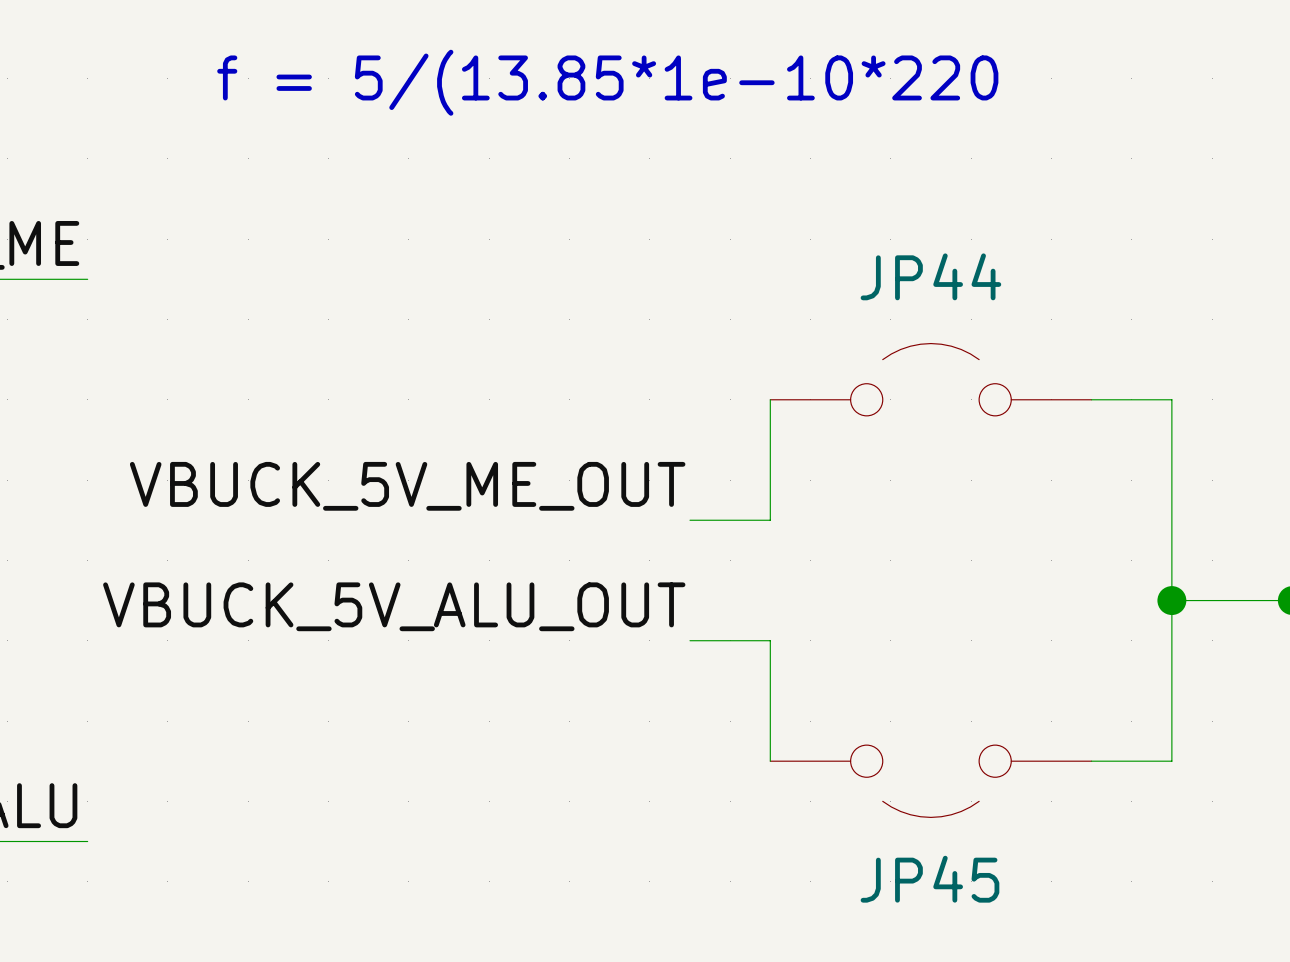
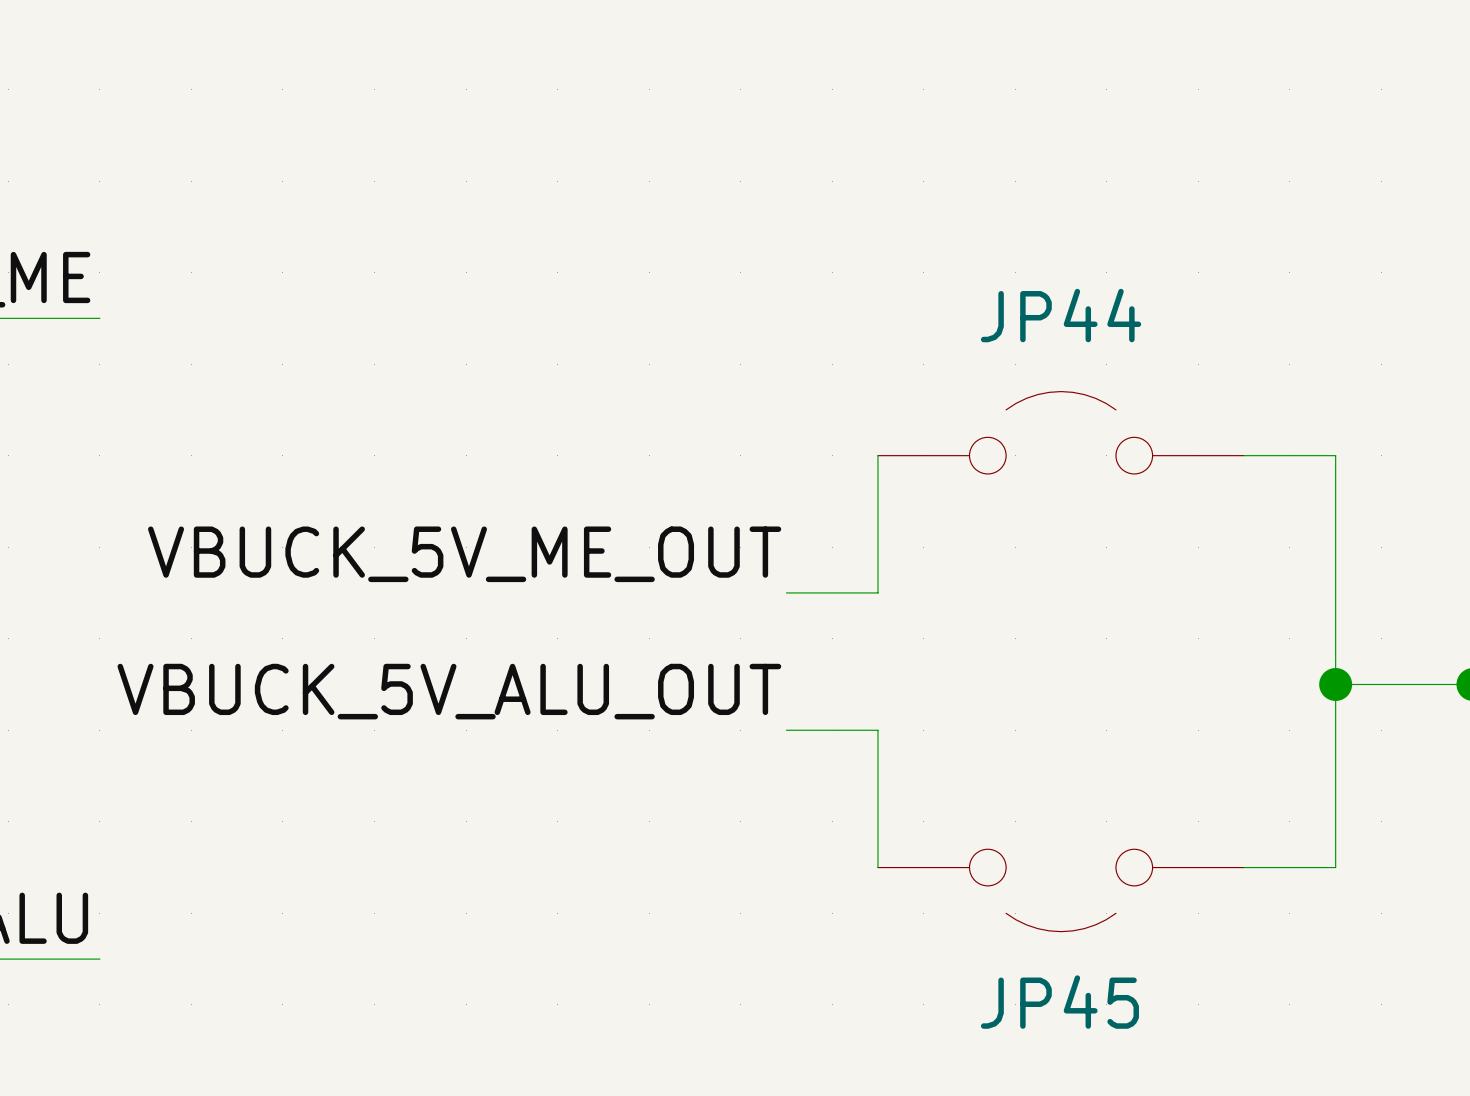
text: f = 5/(13.85*1e-10*220 (607, 82) -> none

